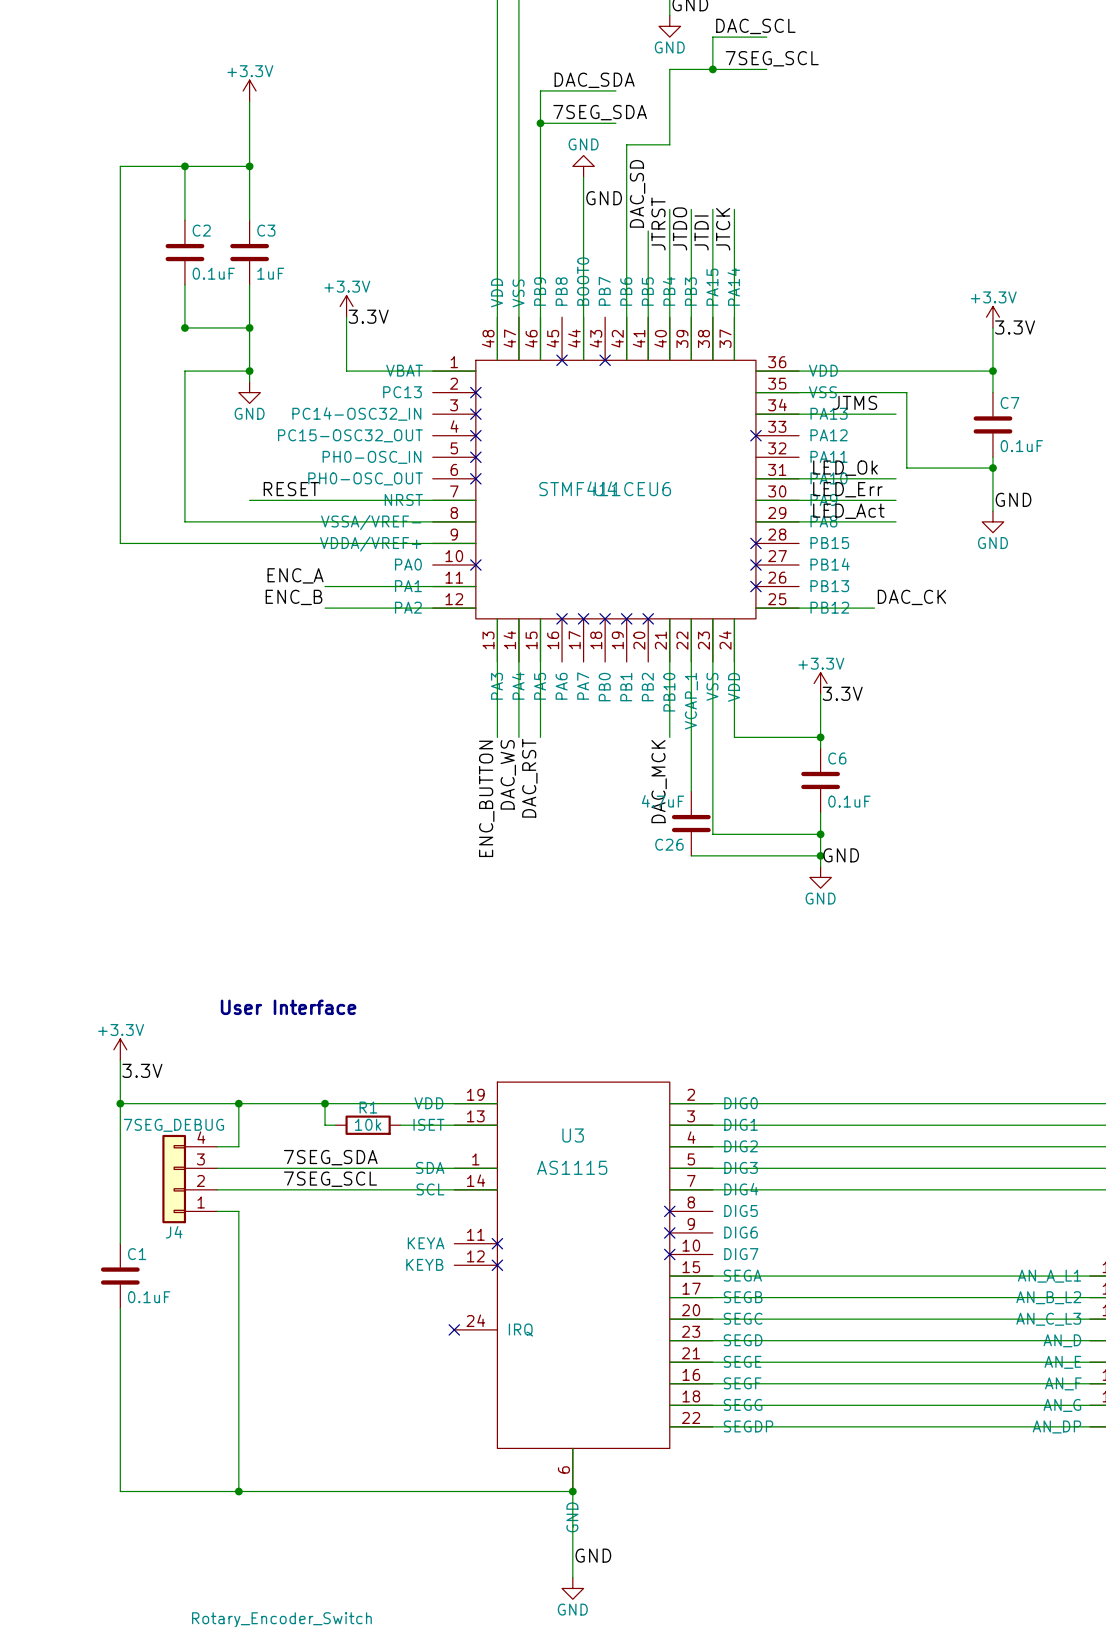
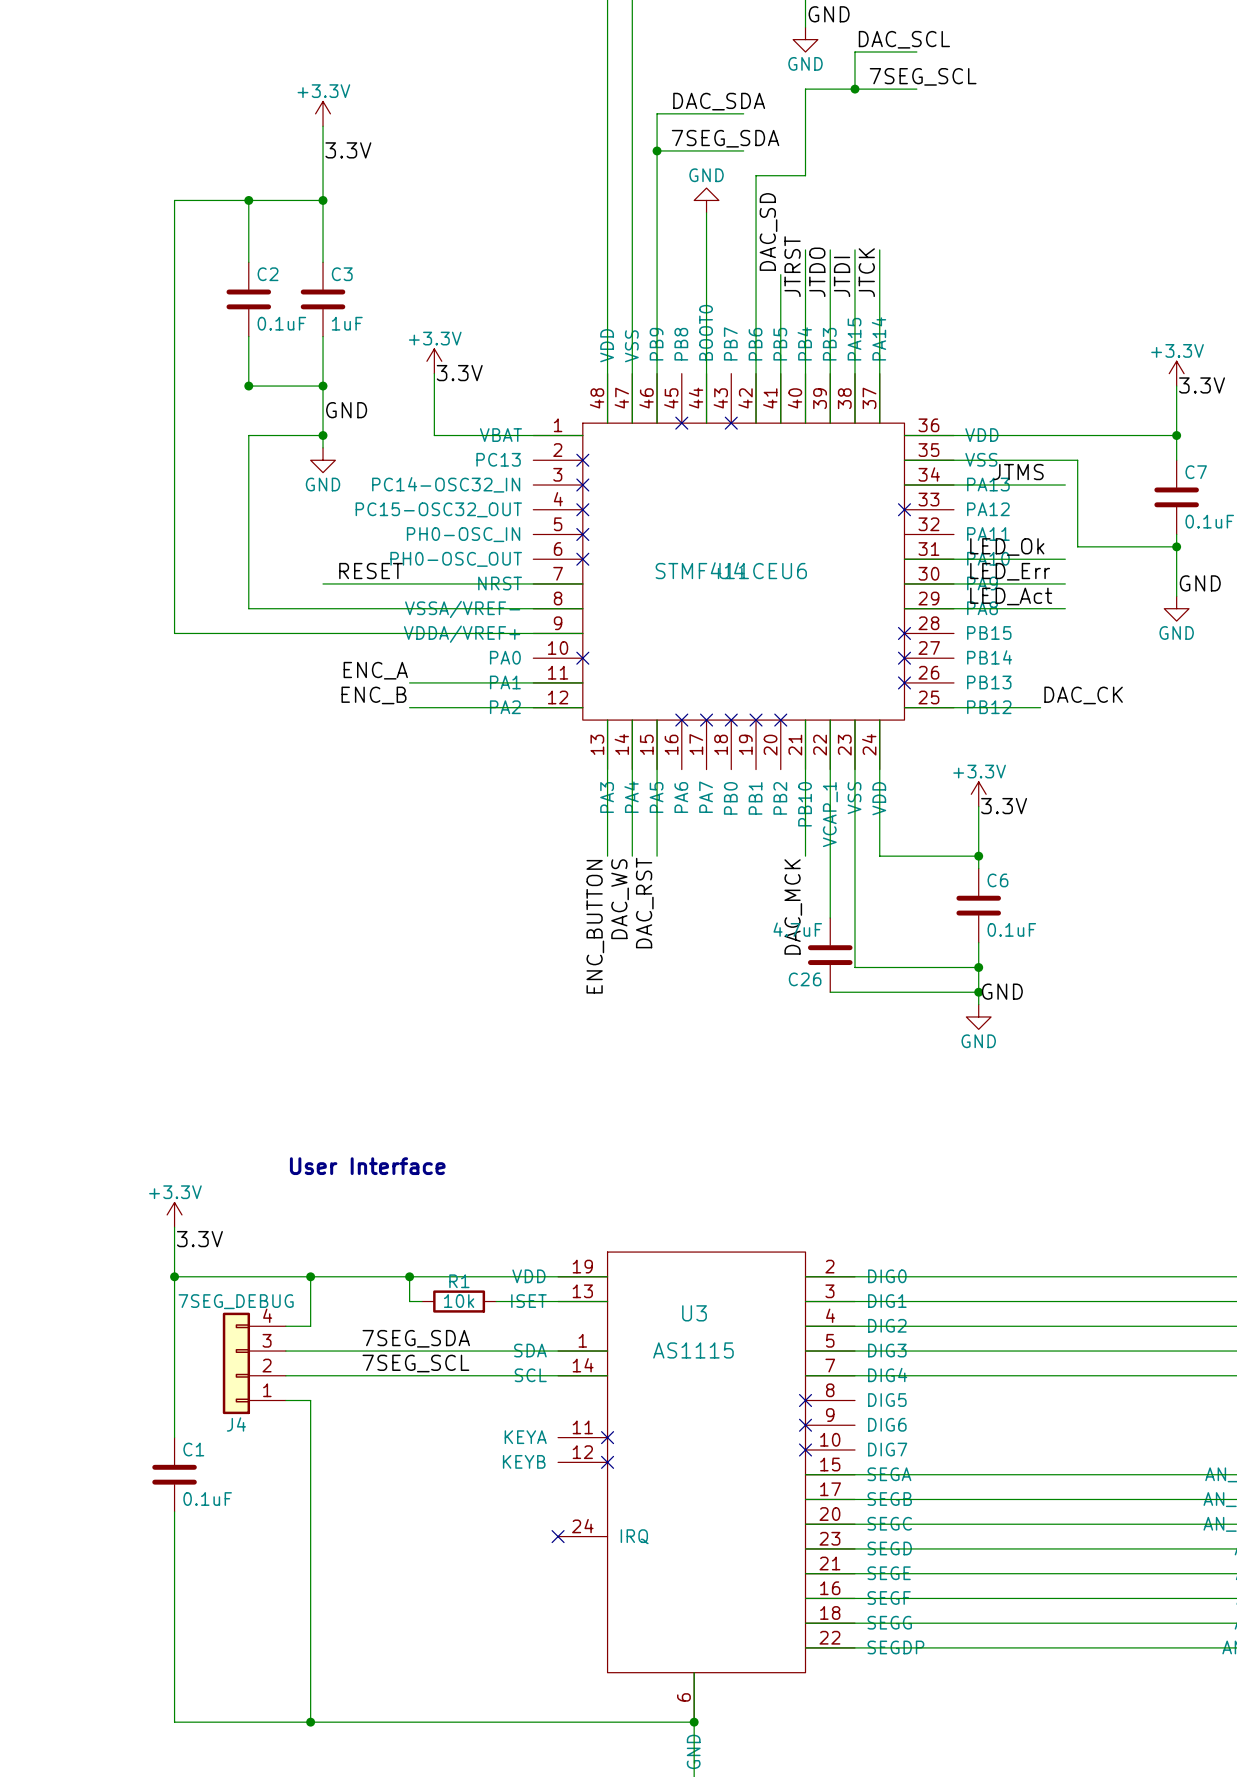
label: none -> 3.3V (348, 150)
label: GND (604, 198) -> none
label: none -> GND (346, 410)

